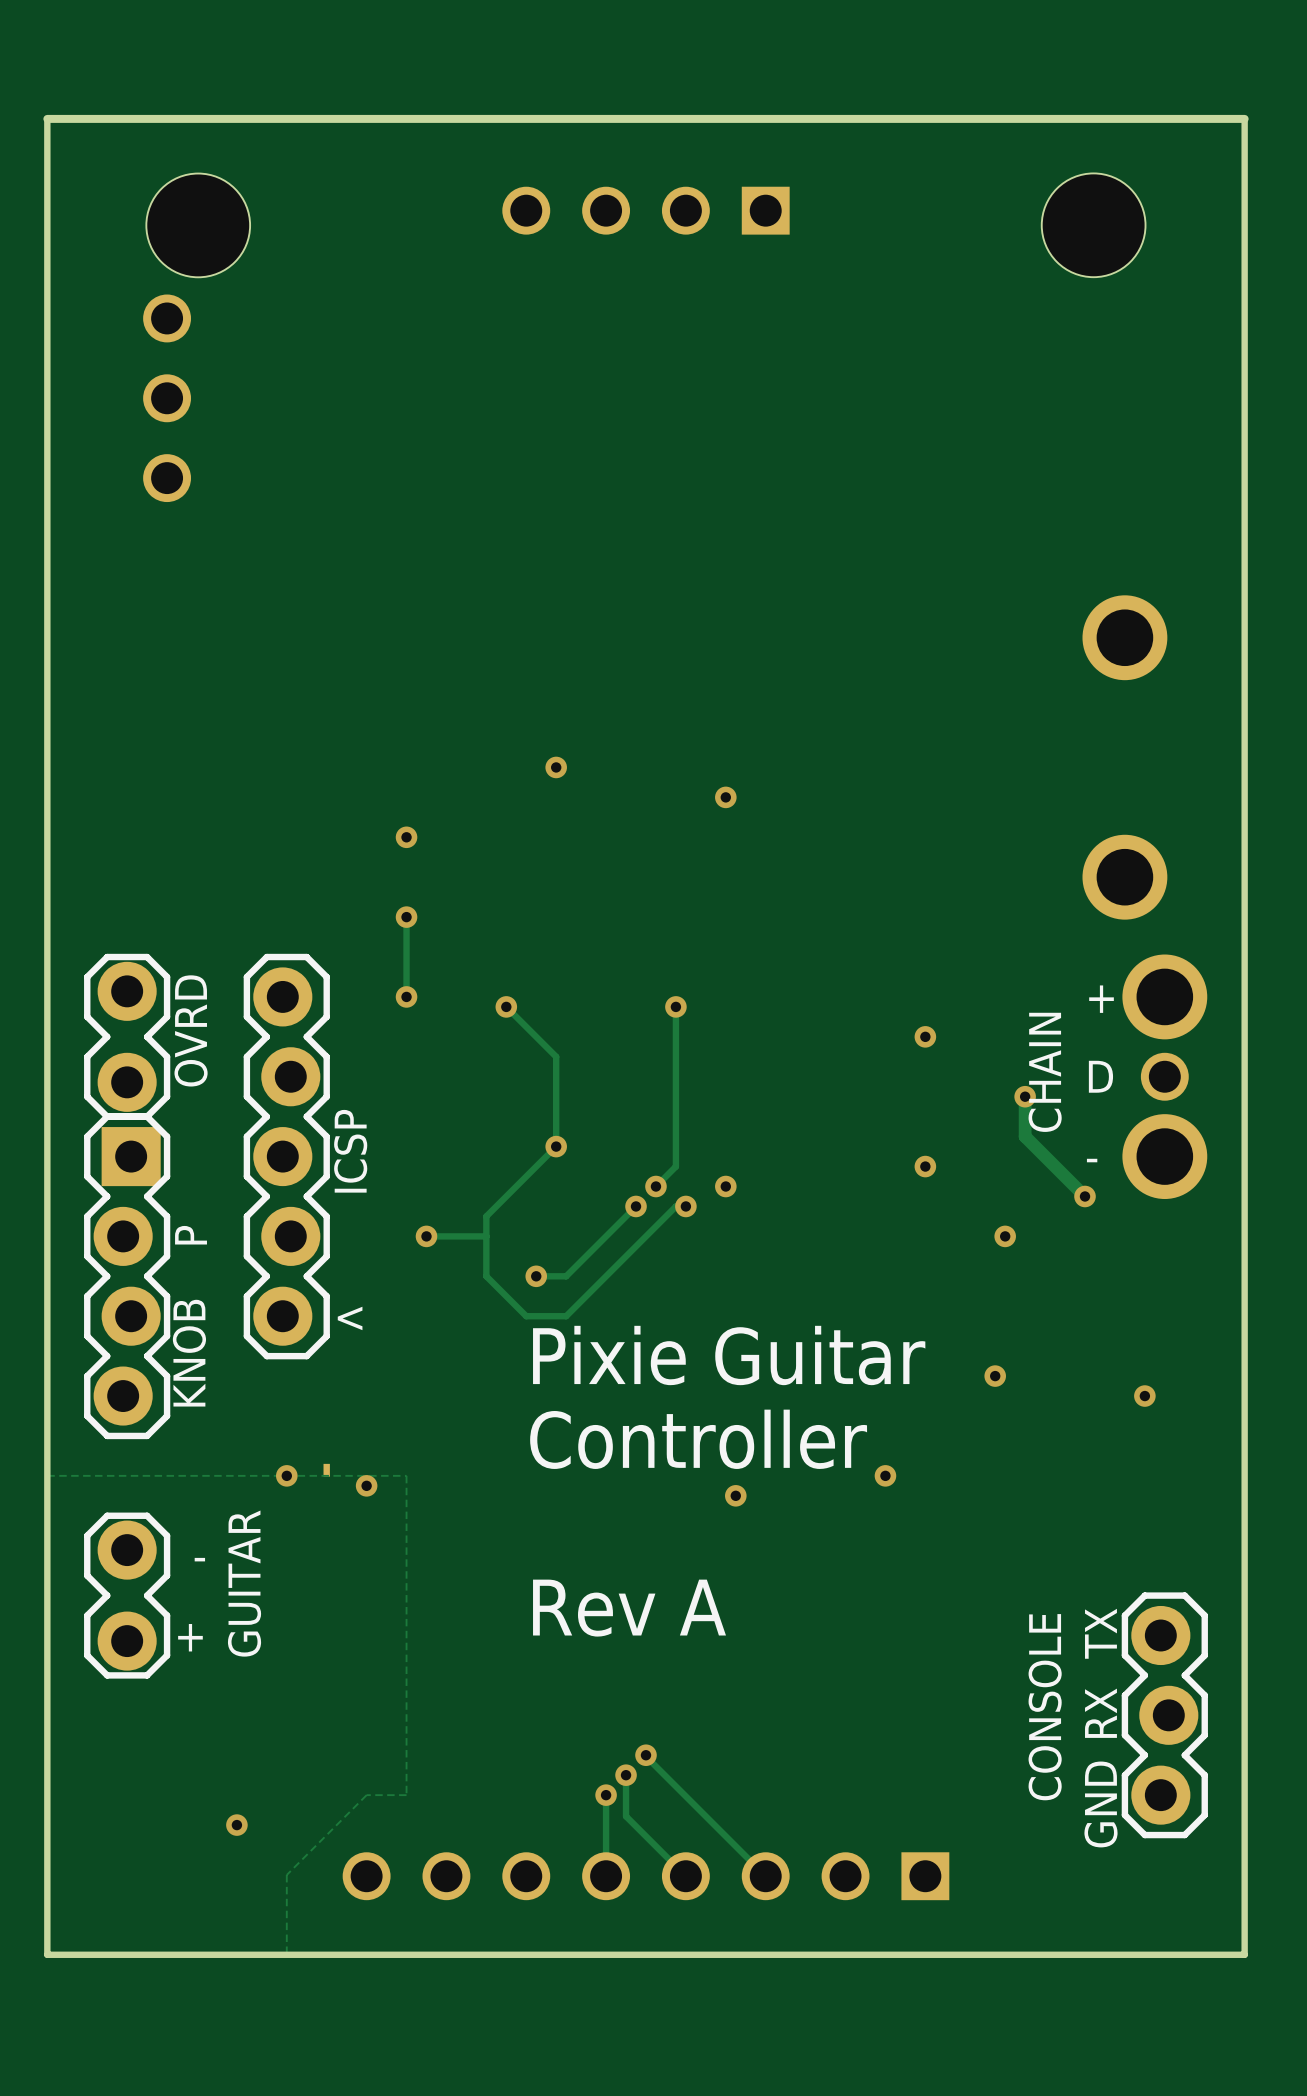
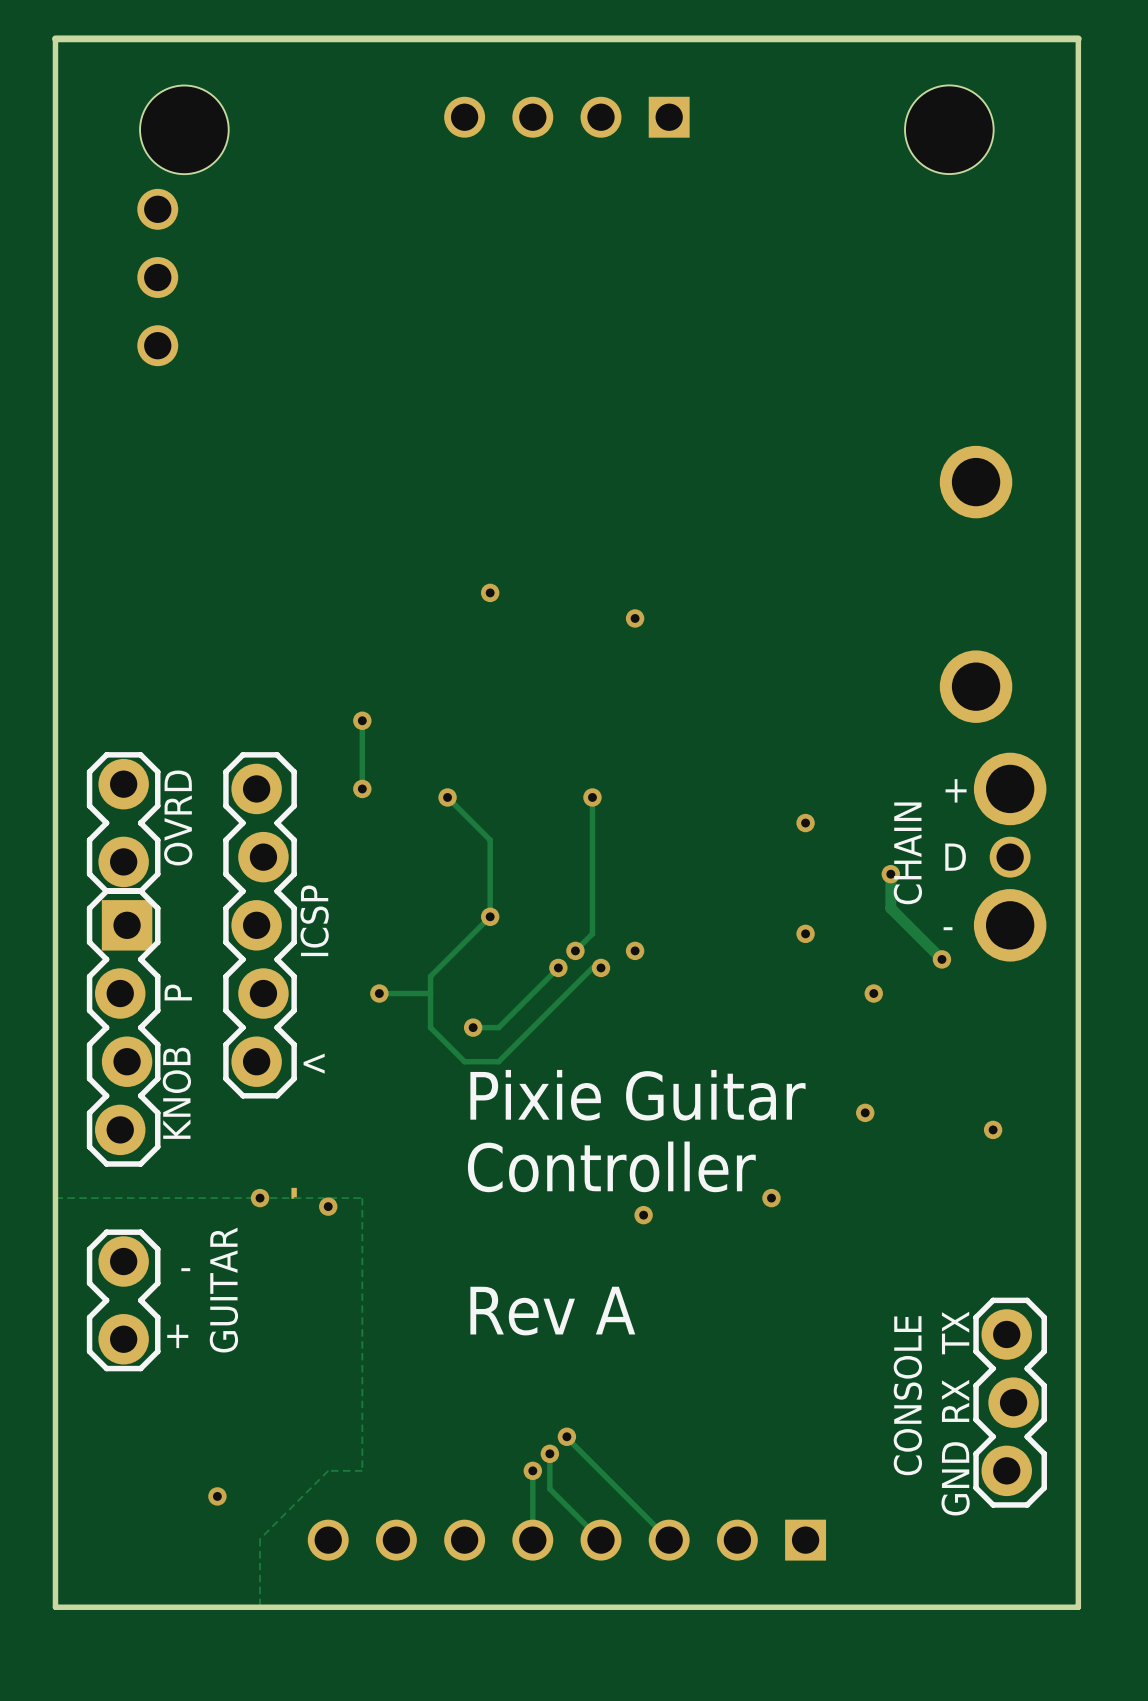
via: (406, 837) -> none

